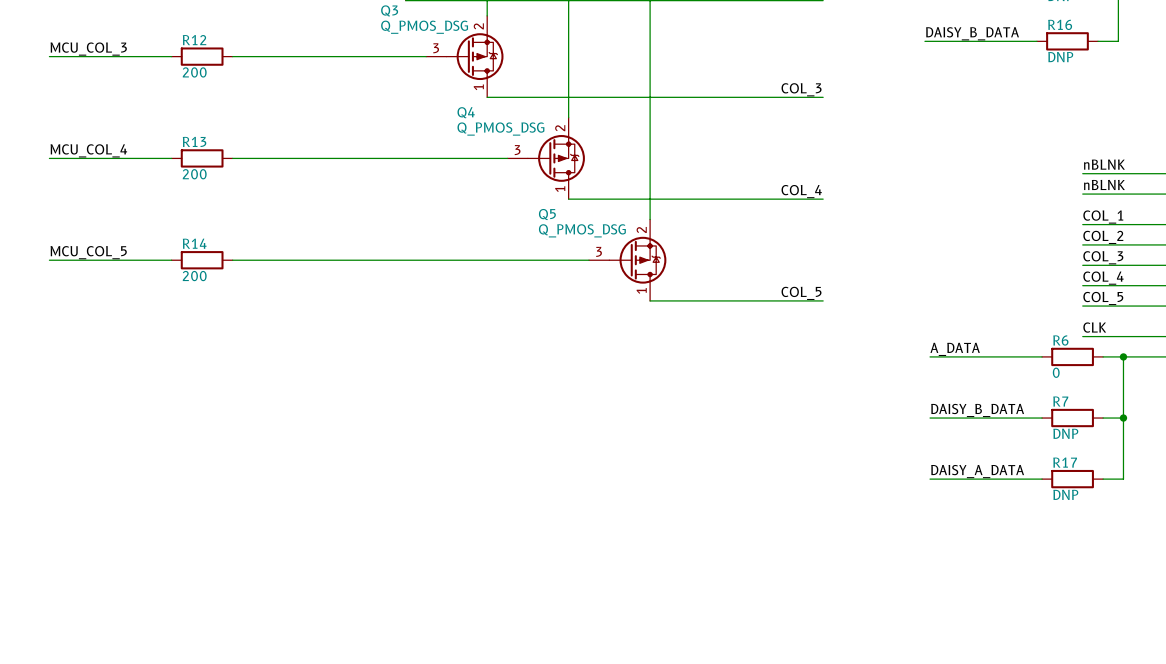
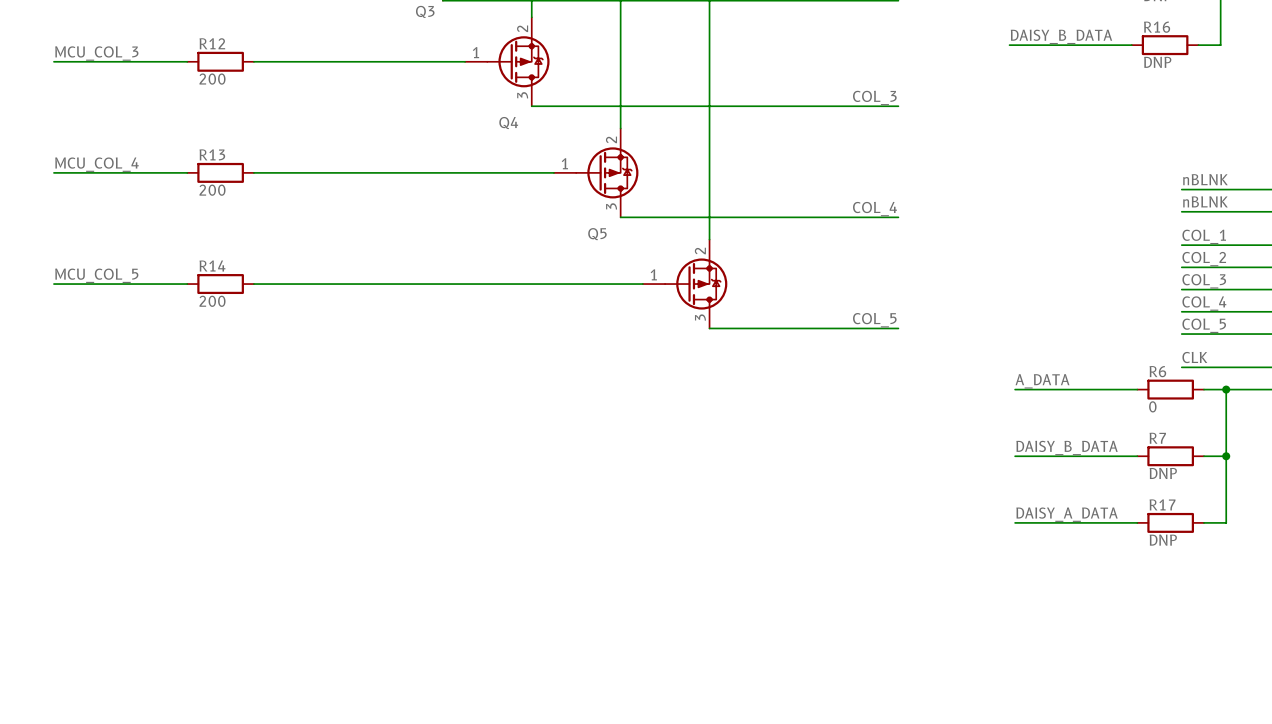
Q3 value: Q_PMOS_DSG (424, 27) -> none
Q3 pin number: 3 (436, 48) -> 1 (476, 52)
Q3 pin number: 1 (478, 87) -> 3 (522, 95)
Q4 value: Q_PMOS_DSG (500, 129) -> none
Q4 pin number: 3 (517, 150) -> 1 (564, 163)
Q4 pin number: 1 (560, 189) -> 3 (611, 206)
Q5 value: Q_PMOS_DSG (582, 230) -> none
Q5 pin number: 3 (599, 251) -> 1 (653, 274)
Q5 pin number: 1 (641, 290) -> 3 (700, 317)

